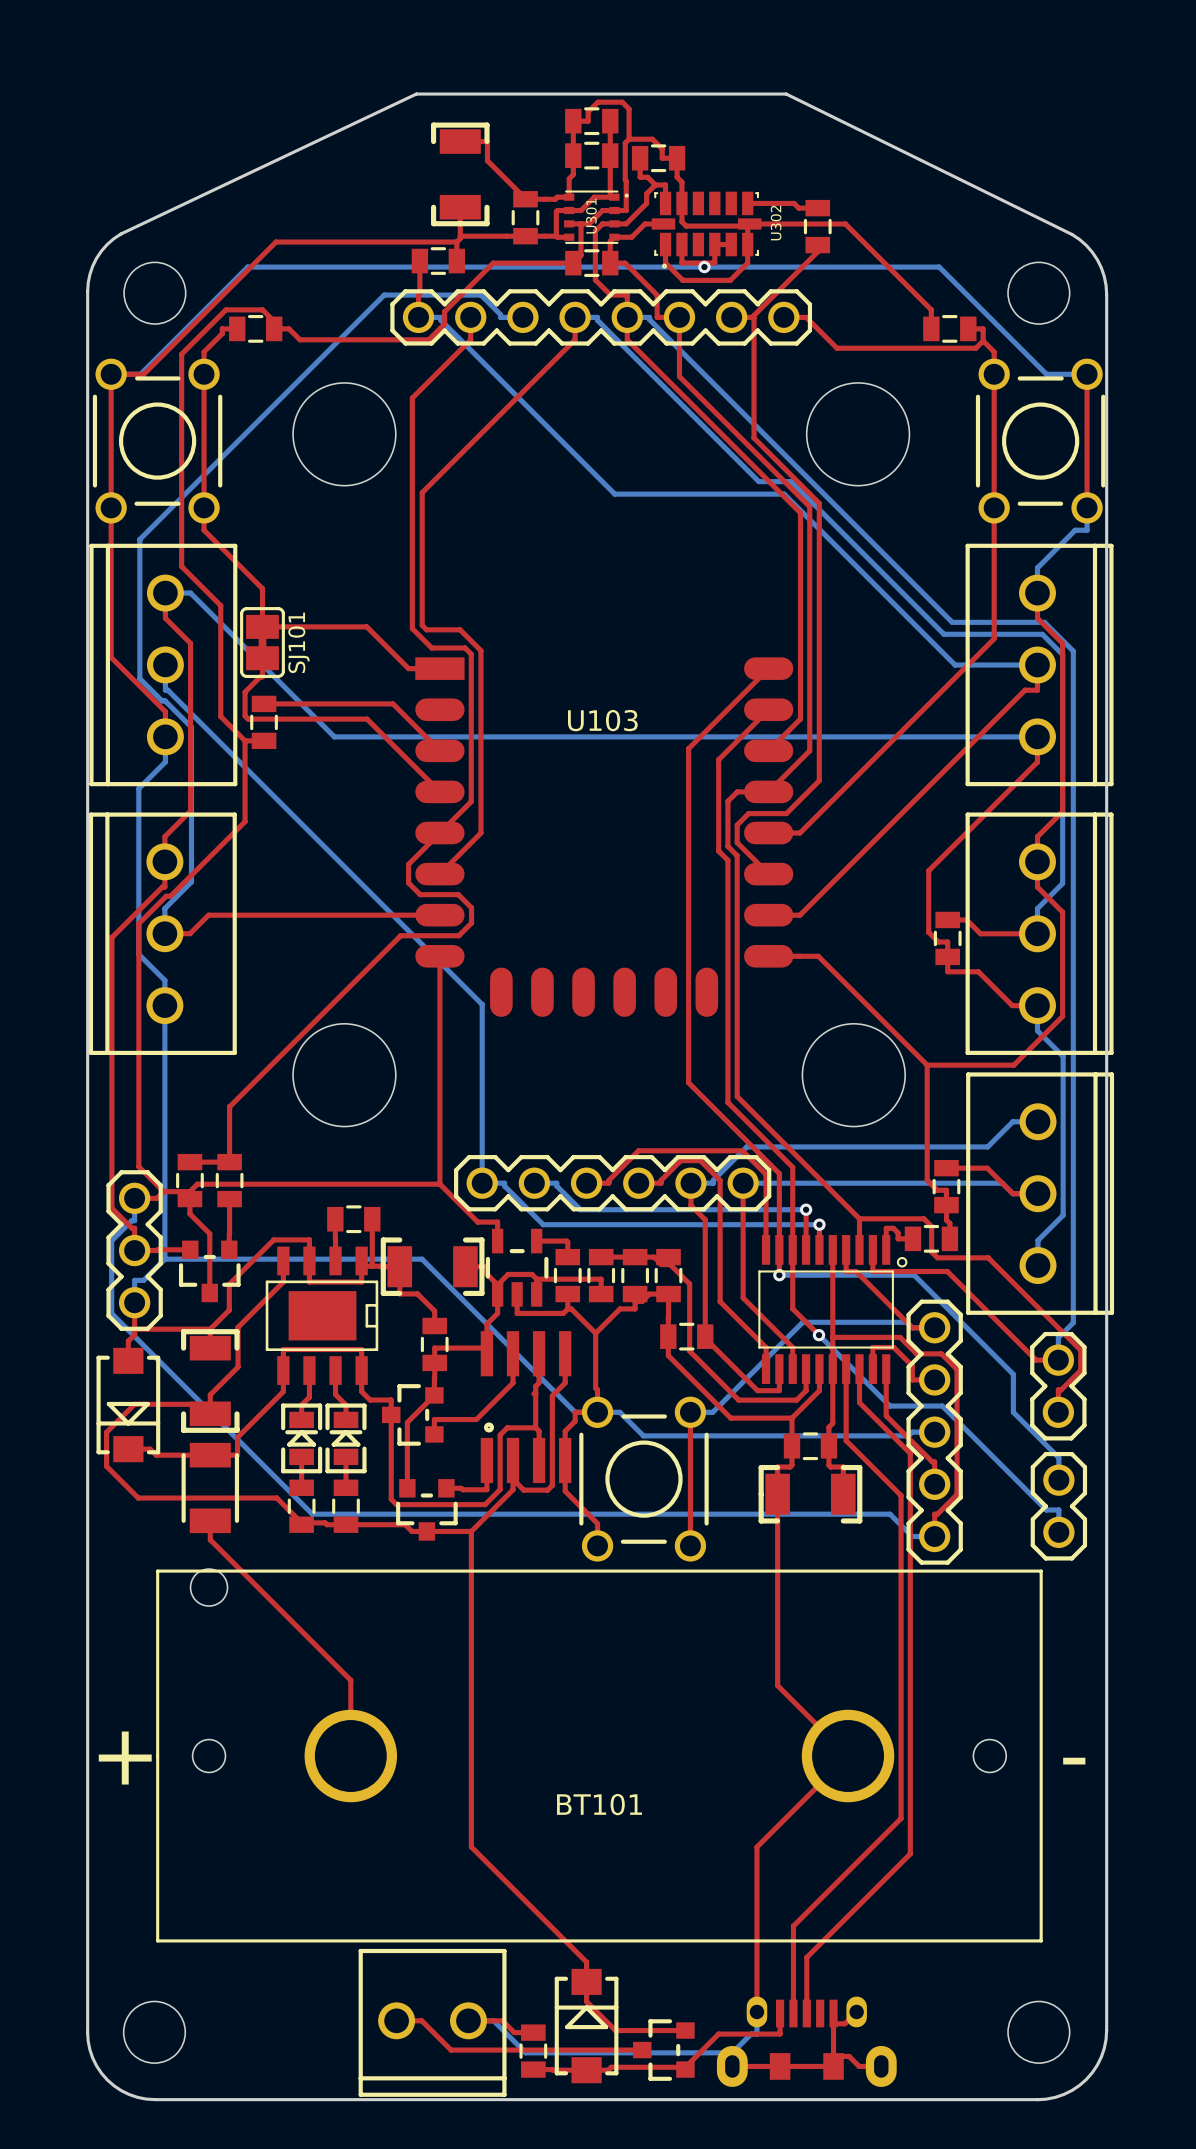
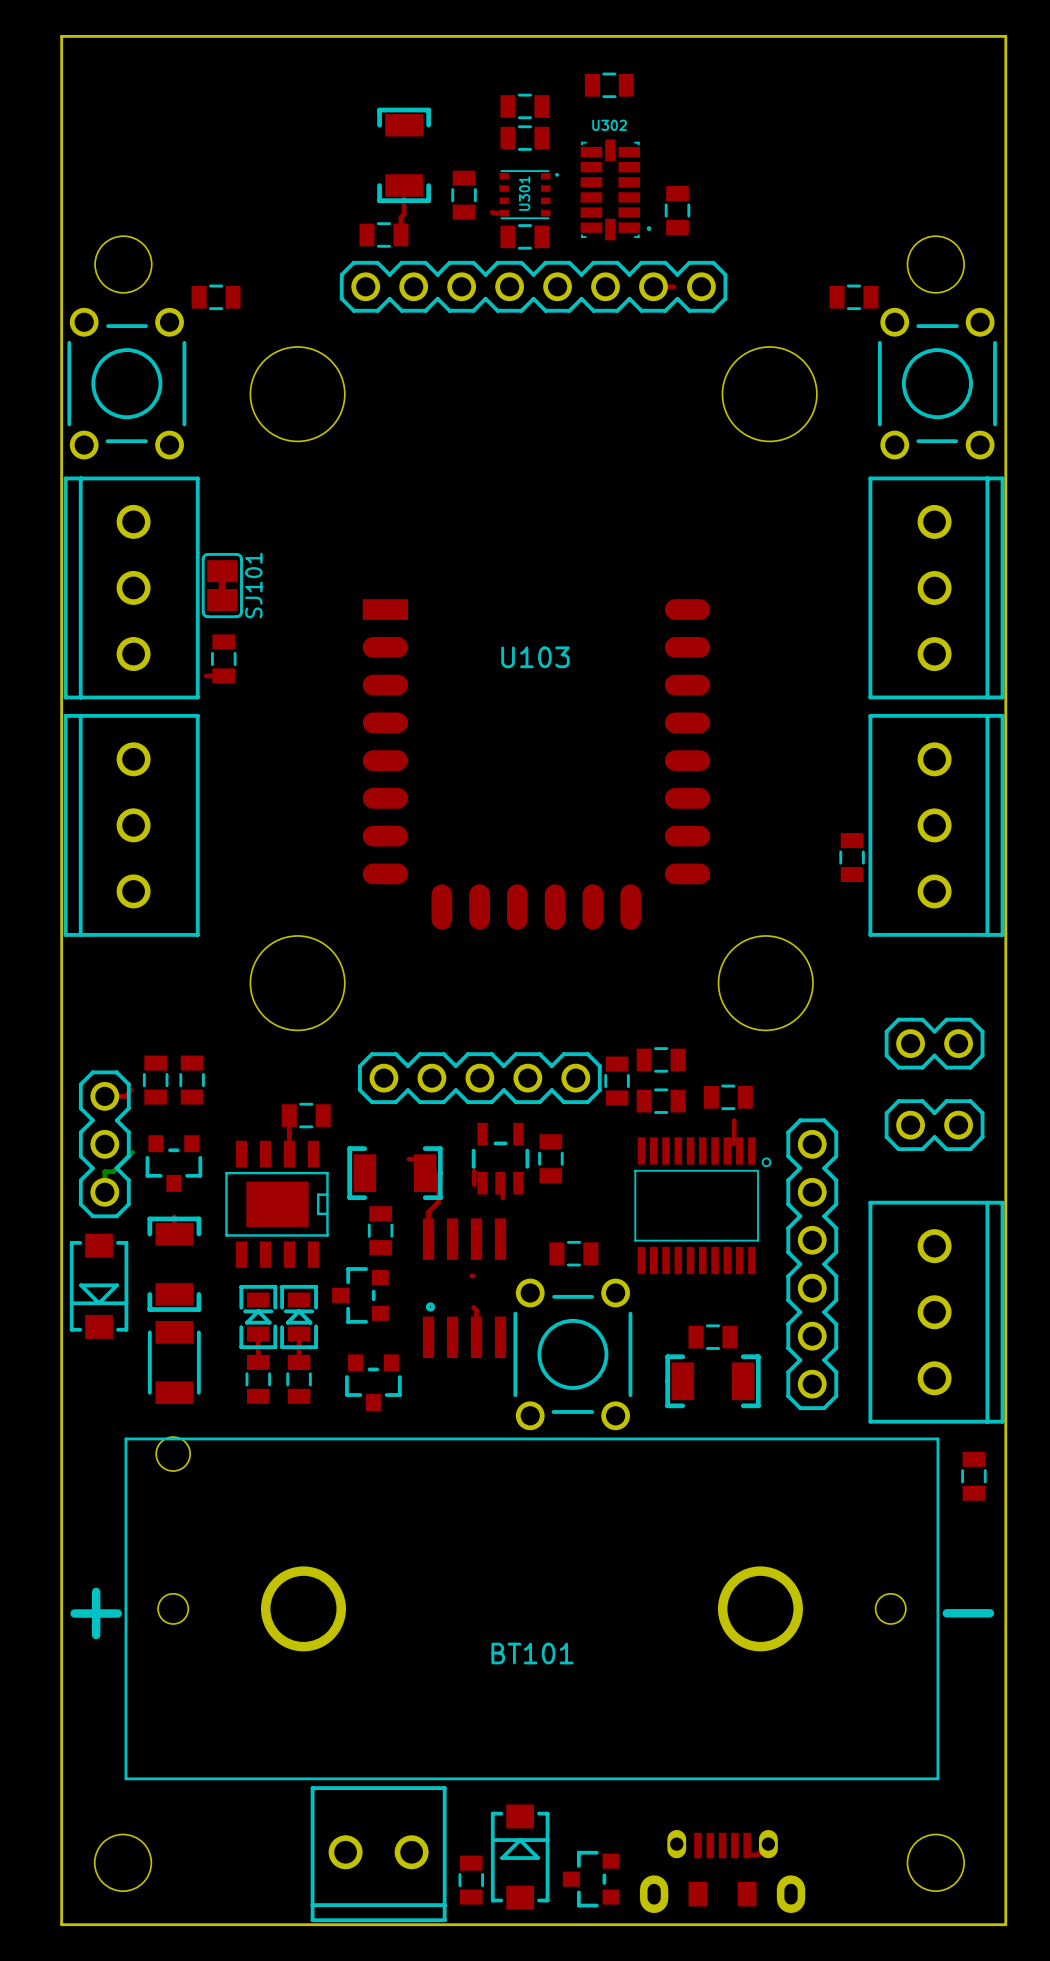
part: none -> (609, 85)
top track: (610, 121) (610, 197) -> none
top track: (629, 139) (629, 109) (622, 102) (597, 102) (588, 111) (588, 121) (573, 121) (573, 174) (569, 178) (569, 197) (525, 199) -> none
top track: (629, 139) (652, 139) (662, 148) (662, 158) (677, 158) (677, 177) (681, 182) (681, 221) (686, 226) (747, 226) -> none
top track: (629, 139) (625, 143) (626, 210) (602, 210) (589, 223) (569, 223) -> none
top track: (460, 141) (487, 141) (487, 160) (525, 199) -> none
top track: (640, 158) (640, 177) (647, 177) (655, 184) -> none
part: (658, 158) -> none
top track: (655, 184) (665, 184) (665, 203) -> none
top track: (655, 184) (646, 193) (646, 203) (626, 223) (602, 223) (595, 231) (595, 279) (610, 295) (627, 295) (627, 339) (800, 512) (800, 719) (768, 750) -> none
top track: (614, 197) (594, 197) (581, 210) (557, 210) (556, 236) (460, 236) -> none
top track: (747, 203) (794, 203) (798, 208) (817, 208) -> none
top track: (581, 223) (581, 255) (573, 263) (493, 263) (444, 311) (444, 323) (428, 339) (299, 339) (289, 328) (274, 328) -> none
top track: (663, 223) (645, 223) (631, 237) (614, 237) (610, 241) (610, 263) (625, 263) (657, 295) (657, 317) (679, 317) (679, 376) (809, 506) (809, 750) (768, 791) (737, 791) (727, 801) (727, 846) (737, 855) (737, 1096) (859, 1218) -> none
top track: (747, 226) (747, 262) (730, 280) (682, 280) (665, 262) (665, 244) -> none
top track: (747, 226) (749, 223) (845, 223) (931, 309) (931, 328) -> none
part position: (817, 226) -> (677, 210)
U302 rotation: 0° (706, 230) -> 90° counterclockwise (615, 189)
top track: (456, 242) (275, 242) (143, 374) (111, 374) (111, 657) (165, 711) (165, 736) -> none
top track: (681, 244) (681, 262) (714, 262) (714, 244) (731, 244) -> none
top track: (817, 245) (817, 251) (754, 315) (754, 438) (819, 503) (819, 780) (786, 813) (748, 813) (737, 825) (737, 842) (768, 874) -> none
top track: (419, 261) (418, 317) -> none
via: (704, 267) -> none
board edge: (87, 291) (89, 274) (96, 258) (107, 244) (120, 234) (416, 94) (786, 94) (1071, 234) (1086, 245) (1097, 259) (1104, 276) (1106, 294) (1106, 2030) (1101, 2056) (1086, 2079) (1063, 2094) (1037, 2099) -> (61, 262) (61, 36) (1005, 36) (1005, 1924) (934, 1924)
bottom track: (418, 317) (440, 317) (440, 320) (614, 494) (784, 494) (955, 665) (1037, 665) -> none
top track: (470, 317) (470, 339) (412, 398) (412, 628) (431, 647) (465, 647) (471, 654) (471, 801) (408, 864) (408, 883) (420, 894) (458, 894) (471, 907) (471, 923) (458, 935) (400, 935) (229, 1106) (229, 1162) (189, 1162) -> none
bottom track: (522, 317) (500, 317) (500, 314) (481, 295) (384, 295) (139, 539) (139, 678) (191, 727) (191, 881) (164, 908) (164, 933) -> none
top track: (575, 317) (575, 339) (422, 492) (422, 625) (426, 629) (460, 629) (480, 650) (480, 833) (439, 874) -> none
bottom track: (575, 317) (597, 317) (597, 320) (758, 481) (791, 481) (943, 634) (1042, 634) (1062, 654) (1062, 883) (1037, 908) (1037, 933) -> none
bottom track: (627, 317) (649, 317) (649, 319) (952, 622) (1044, 622) (1073, 651) (1073, 1322) (1058, 1337) (1058, 1360) -> none
top track: (783, 317) (806, 317) (837, 348) (975, 348) (983, 340) -> none
top track: (237, 328) (222, 328) (222, 333) (204, 351) (204, 530) (262, 588) (262, 626) (366, 626) (408, 668) (439, 668) -> none
top track: (281, 328) (262, 309) (225, 309) (181, 354) (181, 566) (220, 605) (220, 716) (245, 740) (245, 821) (170, 896) (166, 896) (138, 923) (138, 1166) (163, 1191) (189, 1191) -> none
top track: (968, 328) (983, 328) (983, 340) -> none
top track: (983, 340) (994, 351) (994, 638) (800, 833) (768, 833) -> none
bottom track: (111, 374) (140, 374) (247, 267) (939, 267) (1046, 374) (1087, 374) -> none
top track: (1087, 374) (1087, 507) -> none
part position: (157, 441) -> (126, 383)
part position: (1040, 441) -> (937, 383)
bottom track: (1087, 507) (1087, 530) (1075, 530) (1037, 567) (1037, 593) -> none
top track: (165, 593) (165, 618) (190, 643) (190, 810) (164, 836) (164, 886) (162, 886) (111, 937) (111, 1208) (131, 1228) (134, 1228) (134, 1250) (190, 1249) -> none
bottom track: (165, 593) (190, 593) (334, 736) (1037, 736) -> none
top track: (1037, 593) (1037, 618) (1062, 643) (1062, 811) (1037, 836) (1037, 887) (1062, 912) (1062, 1016) (1013, 1065) (927, 1065) -> none
top track: (262, 658) (262, 676) (245, 692) (245, 715) (248, 719) (367, 719) (439, 791) -> none
part position: (163, 664) -> (131, 587)
bottom track: (165, 664) (165, 690) (167, 690) (482, 1004) (482, 1183) (504, 1183) (504, 1186) (543, 1224) (819, 1224) -> none
part position: (1039, 664) -> (936, 587)
top track: (1037, 665) (1037, 690) (1025, 690) (800, 915) (768, 915) -> none
top track: (768, 668) (688, 748) (688, 1082) (779, 1173) (779, 1275) -> none
top track: (264, 703) (393, 703) (439, 750) -> none
top track: (768, 709) (718, 759) (718, 851) (727, 860) (727, 1102) (792, 1167) (792, 1308) (819, 1335) -> none
bottom track: (165, 736) (165, 762) (138, 788) (138, 954) (164, 980) (164, 1259) (422, 1259) (575, 1412) (619, 1412) (643, 1435) (908, 1435) (912, 1432) (934, 1432) -> none
top track: (1037, 736) (1037, 762) (928, 870) (928, 932) (938, 942) (947, 942) (947, 971) (978, 971) (1012, 1005) (1037, 1005) -> none
top track: (439, 915) (208, 915) (190, 933) (164, 933) -> none
top track: (947, 919) (966, 919) (980, 933) (1037, 933) -> none
part position: (162, 933) -> (131, 825)
part position: (1039, 933) -> (936, 825)
top track: (439, 956) (439, 1184) -> none
top track: (768, 956) (818, 956) (927, 1065) -> none
bottom track: (1037, 1005) (1037, 1030) (1063, 1056) (1063, 1215) (1038, 1240) (1038, 1265) -> none
top track: (927, 1065) (927, 1180) (937, 1190) (946, 1190) (946, 1220) (949, 1223) (949, 1238) -> none
bottom track: (1038, 1121) (1012, 1121) (987, 1146) (746, 1146) (713, 1180) (713, 1183) (690, 1183) -> none
part: none -> (934, 1043)
part: none -> (661, 1059)
top track: (946, 1168) (987, 1168) (1012, 1193) (1038, 1193) -> none
part: none -> (617, 1081)
bottom track: (534, 1183) (556, 1183) (556, 1186) (580, 1209) (806, 1209) -> none
top track: (586, 1183) (608, 1183) (608, 1180) (638, 1150) (742, 1150) (766, 1174) (766, 1249) -> none
part rotation: 0° (612, 1183) -> 90° clockwise (812, 1264)
part position: (612, 1183) -> (812, 1264)
top track: (638, 1183) (661, 1183) (661, 1180) (680, 1160) (700, 1160) (720, 1180) (720, 1301) (766, 1347) (766, 1369) -> none
top track: (690, 1183) (690, 1205) (705, 1219) (705, 1338) (757, 1390) (779, 1390) (779, 1369) -> none
top track: (743, 1183) (743, 1297) (792, 1347) (792, 1369) -> none
bottom track: (743, 1183) (1002, 1183) (1012, 1193) (1038, 1193) -> none
top track: (439, 1184) (477, 1222) (497, 1222) (497, 1241) -> none
top track: (439, 1184) (197, 1184) (189, 1191) -> none
part: (946, 1186) -> none
top track: (189, 1191) (189, 1213) (209, 1233) (209, 1292) -> none
part: (1040, 1193) -> none
bottom track: (134, 1198) (134, 1220) (131, 1220) (111, 1240) (111, 1313) (312, 1514) (890, 1514) (912, 1536) (934, 1536) -> none
top track: (229, 1199) (229, 1249) -> none
part: none -> (728, 1097)
part: none -> (661, 1101)
top track: (806, 1209) (806, 1249) -> none
via: (806, 1209) -> none
top track: (859, 1218) (859, 1249) -> none
top track: (859, 1218) (923, 1218) (931, 1226) (931, 1251) (937, 1257) (988, 1257) (1080, 1350) (1080, 1370) (1061, 1389) (1058, 1389) (1058, 1412) -> none
top track: (372, 1219) (372, 1266) -> none
via: (819, 1224) -> none
part: none -> (934, 1125)
top track: (912, 1238) (898, 1238) (898, 1232) (893, 1228) (886, 1228) (886, 1249) -> none
part: (931, 1238) -> none
top track: (536, 1241) (566, 1241) (567, 1257) -> none
part footprint: [553, 1248, 582, 1303] -> [471, 1122, 530, 1195]
top track: (832, 1249) (832, 1423) (828, 1427) (828, 1465) (830, 1467) (843, 1467) (843, 1494) -> none
top track: (846, 1249) (846, 1271) (856, 1271) (912, 1327) (934, 1327) -> none
top track: (872, 1249) (872, 1271) (947, 1271) (1036, 1360) (1058, 1360) -> none
top track: (601, 1257) (654, 1257) (661, 1264) (670, 1264) (689, 1284) (689, 1351) (738, 1400) (796, 1400) (806, 1390) (806, 1369) -> none
top track: (283, 1260) (283, 1282) (238, 1327) (238, 1367) (210, 1394) (210, 1413) -> none
top track: (361, 1260) (361, 1282) (309, 1282) (309, 1239) (273, 1239) (229, 1284) (229, 1310) (210, 1329) (134, 1329) -> none
part position: (432, 1266) -> (394, 1173)
part: none -> (550, 1158)
part: (517, 1267) -> none
top track: (361, 1271) (366, 1266) (399, 1266) (399, 1293) (417, 1293) (434, 1311) (434, 1325) -> none
part: (601, 1275) -> none
part: (635, 1275) -> none
part: (668, 1275) -> none
bottom track: (779, 1275) (914, 1275) (1013, 1374) (1013, 1412) (1058, 1457) (1058, 1480) -> none
via: (779, 1275) -> none
top track: (497, 1284) (508, 1274) (531, 1274) (536, 1279) (601, 1279) (601, 1294) -> none
top track: (517, 1294) (517, 1313) (563, 1313) (567, 1308) (571, 1308) (595, 1333) -> none
top track: (635, 1294) (635, 1308) (620, 1308) (595, 1333) -> none
top track: (635, 1301) (642, 1301) (649, 1294) (668, 1294) (668, 1317) -> none
top track: (134, 1302) (134, 1334) (128, 1341) (128, 1360) -> none
part position: (832, 1309) -> (702, 1205)
top track: (668, 1317) (668, 1355) (730, 1418) (791, 1418) -> none
bottom track: (934, 1327) (912, 1327) (906, 1322) (802, 1322) (712, 1412) (690, 1412) -> none
top track: (595, 1333) (597, 1412) (575, 1412) (575, 1421) (565, 1431) (565, 1491) (597, 1523) (597, 1545) -> none
bottom track: (819, 1335) (889, 1406) (942, 1406) (1046, 1510) (1058, 1510) (1058, 1532) -> none
via: (819, 1335) -> none
part: (686, 1336) -> none
top track: (832, 1337) (900, 1337) (916, 1353) (941, 1353) (957, 1369) (957, 1494) (937, 1514) (934, 1514) (934, 1536) -> none
top track: (486, 1348) (434, 1348) (434, 1395) (407, 1422) (407, 1488) -> none
top track: (513, 1353) (513, 1382) (476, 1419) (434, 1419) (434, 1434) -> none
top track: (539, 1353) (539, 1382) (535, 1386) (535, 1427) (507, 1427) (500, 1435) (500, 1489) (485, 1504) (396, 1504) (391, 1499) (391, 1400) (370, 1400) (361, 1391) (361, 1349) (283, 1349) (283, 1391) (237, 1437) (237, 1455) (156, 1455) (150, 1449) (128, 1449) -> none
top track: (565, 1353) (565, 1382) (552, 1395) (552, 1485) (547, 1490) (523, 1490) (513, 1479) -> none
part: none -> (573, 1253)
top track: (819, 1369) (819, 1390) (791, 1418) -> none
top track: (846, 1369) (846, 1440) (901, 1495) (901, 1818) (793, 1926) (793, 2013) -> none
top track: (859, 1369) (859, 1402) (910, 1453) (910, 1853) (806, 1957) (806, 2013) -> none
top track: (872, 1369) (872, 1347) (893, 1347) (912, 1365) (912, 1379) (934, 1379) -> none
top track: (886, 1369) (886, 1415) (932, 1461) (934, 1461) (934, 1484) -> none
top track: (309, 1370) (309, 1397) (301, 1405) (301, 1419) -> none
top track: (335, 1370) (335, 1394) (345, 1405) (345, 1419) -> none
part: (1058, 1386) -> none
top track: (210, 1404) (134, 1404) (106, 1432) (106, 1466) (138, 1498) (276, 1498) (301, 1522) -> none
top track: (690, 1412) (690, 1545) -> none
top track: (791, 1418) (791, 1465) (790, 1467) (777, 1467) (777, 1685) (848, 1756) (756, 1847) (756, 2011) -> none
part rotation: 0° (934, 1432) -> 90° clockwise (479, 1078)
part position: (934, 1432) -> (479, 1078)
part: none -> (936, 1312)
top track: (513, 1445) (513, 1489) (471, 1531) -> none
part position: (810, 1446) -> (712, 1337)
top track: (486, 1460) (486, 1489) (446, 1488) -> none
part position: (810, 1494) -> (712, 1381)
part: (1058, 1506) -> none
top track: (210, 1520) (210, 1539) (350, 1680) (350, 1756) -> none
top track: (301, 1522) (405, 1524) (411, 1531) (471, 1531) -> none
top track: (471, 1531) (471, 1846) (586, 1962) (586, 2001) (615, 2030) (685, 2030) -> none
part: none -> (973, 1476)
bottom track: (756, 2011) (756, 2034) (751, 2034) (732, 2052) -> none
top track: (780, 2013) (780, 2034) (718, 2034) (685, 2067) -> none
top track: (833, 2013) (833, 2066) (732, 2066) -> none
top track: (396, 2020) (421, 2020) (451, 2050) (642, 2050) -> none
top track: (468, 2020) (502, 2020) (514, 2032) (533, 2032) -> none
bottom track: (468, 2020) (493, 2020) (525, 2052) (732, 2052) -> none
board edge: (87, 2032) (92, 2058) (107, 2079) (129, 2094) (154, 2099) -> (61, 1862) (61, 1924) (123, 1924)
top track: (833, 2056) (849, 2056) (859, 2066) (881, 2066) -> none
top track: (685, 2067) (611, 2067) (608, 2070) (533, 2069) -> none

